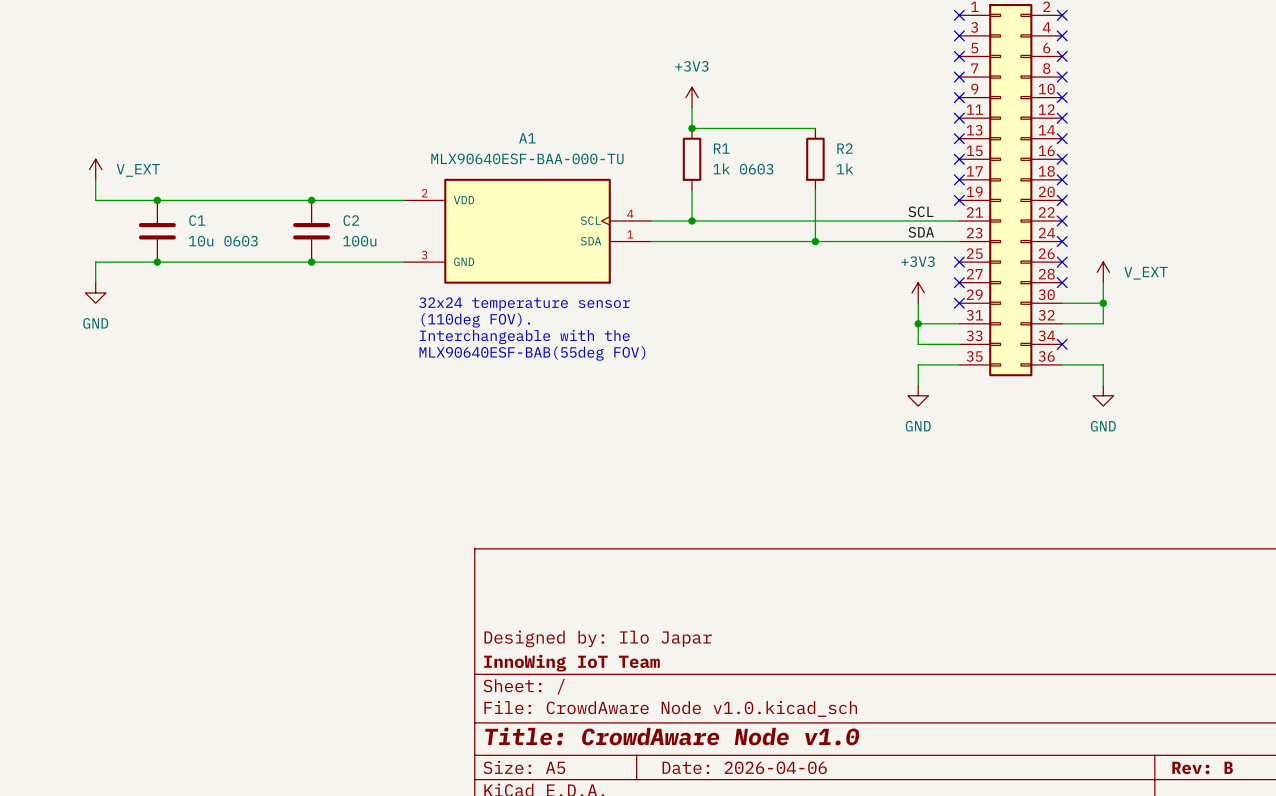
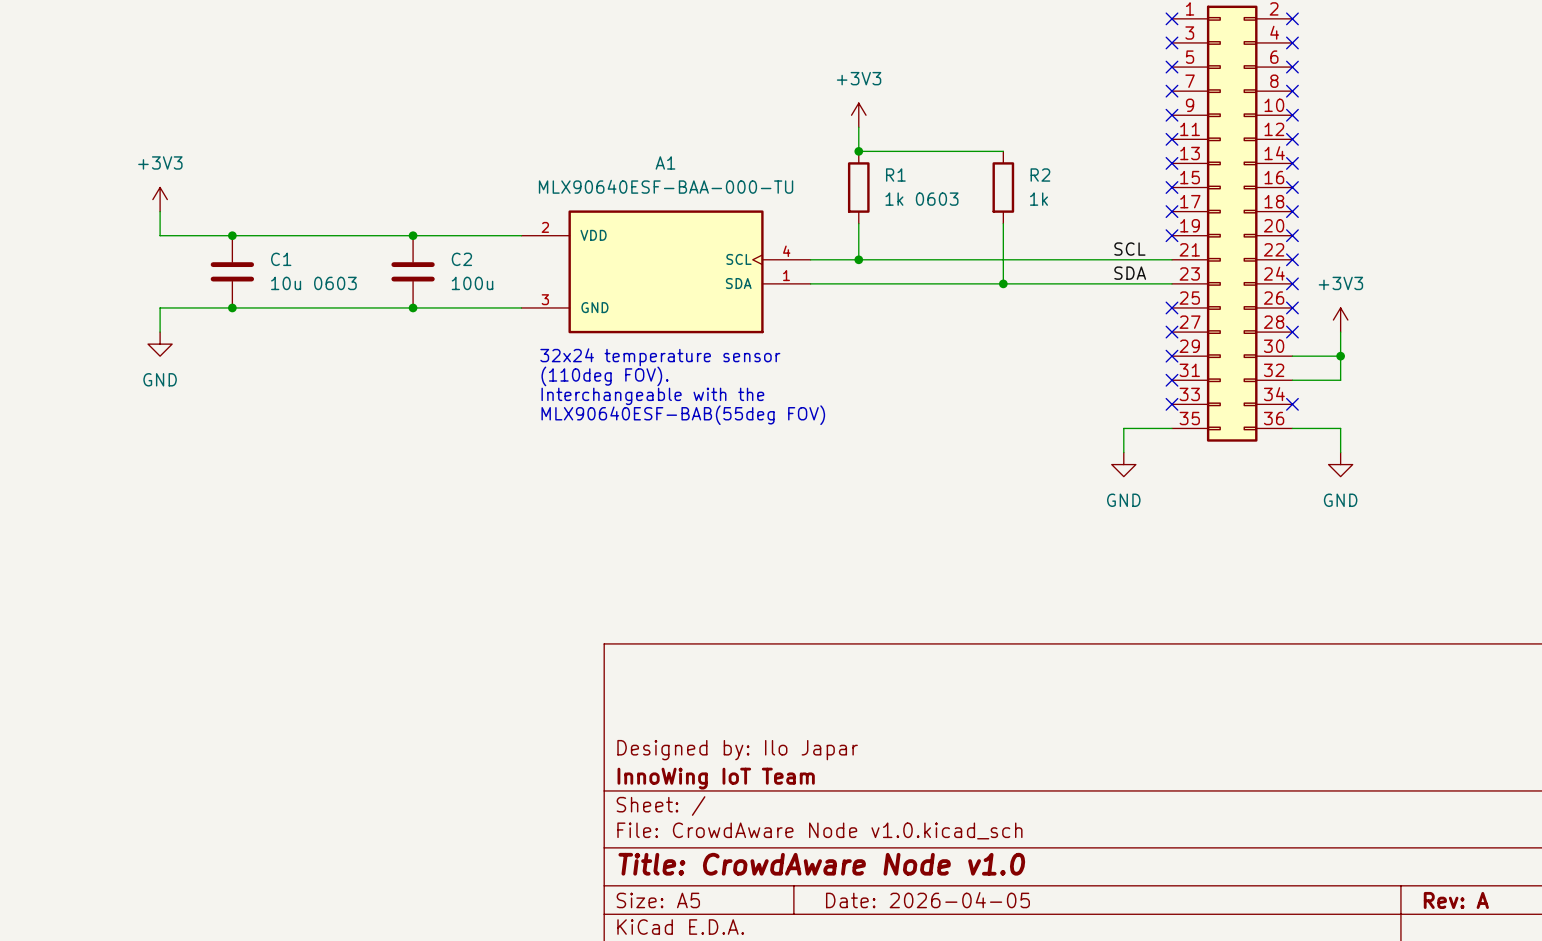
power symbol: V_EXT (95, 169) -> +3V3 (160, 199)
power symbol: V_EXT (1103, 272) -> +3V3 (1340, 320)
power symbol: +3V3 (918, 292) -> none
wire: (918, 303) (918, 344) (959, 344) -> none
wire: (918, 323) (959, 323) -> none
junction: (918, 323) -> none
no-connect mark: none -> (1171, 380)
no-connect mark: none -> (1171, 404)
title block: Date: 2026-04-06 (744, 767) -> Date: 2026-04-05 (927, 900)
title block: Rev: B (1202, 767) -> Rev: A (1456, 900)

